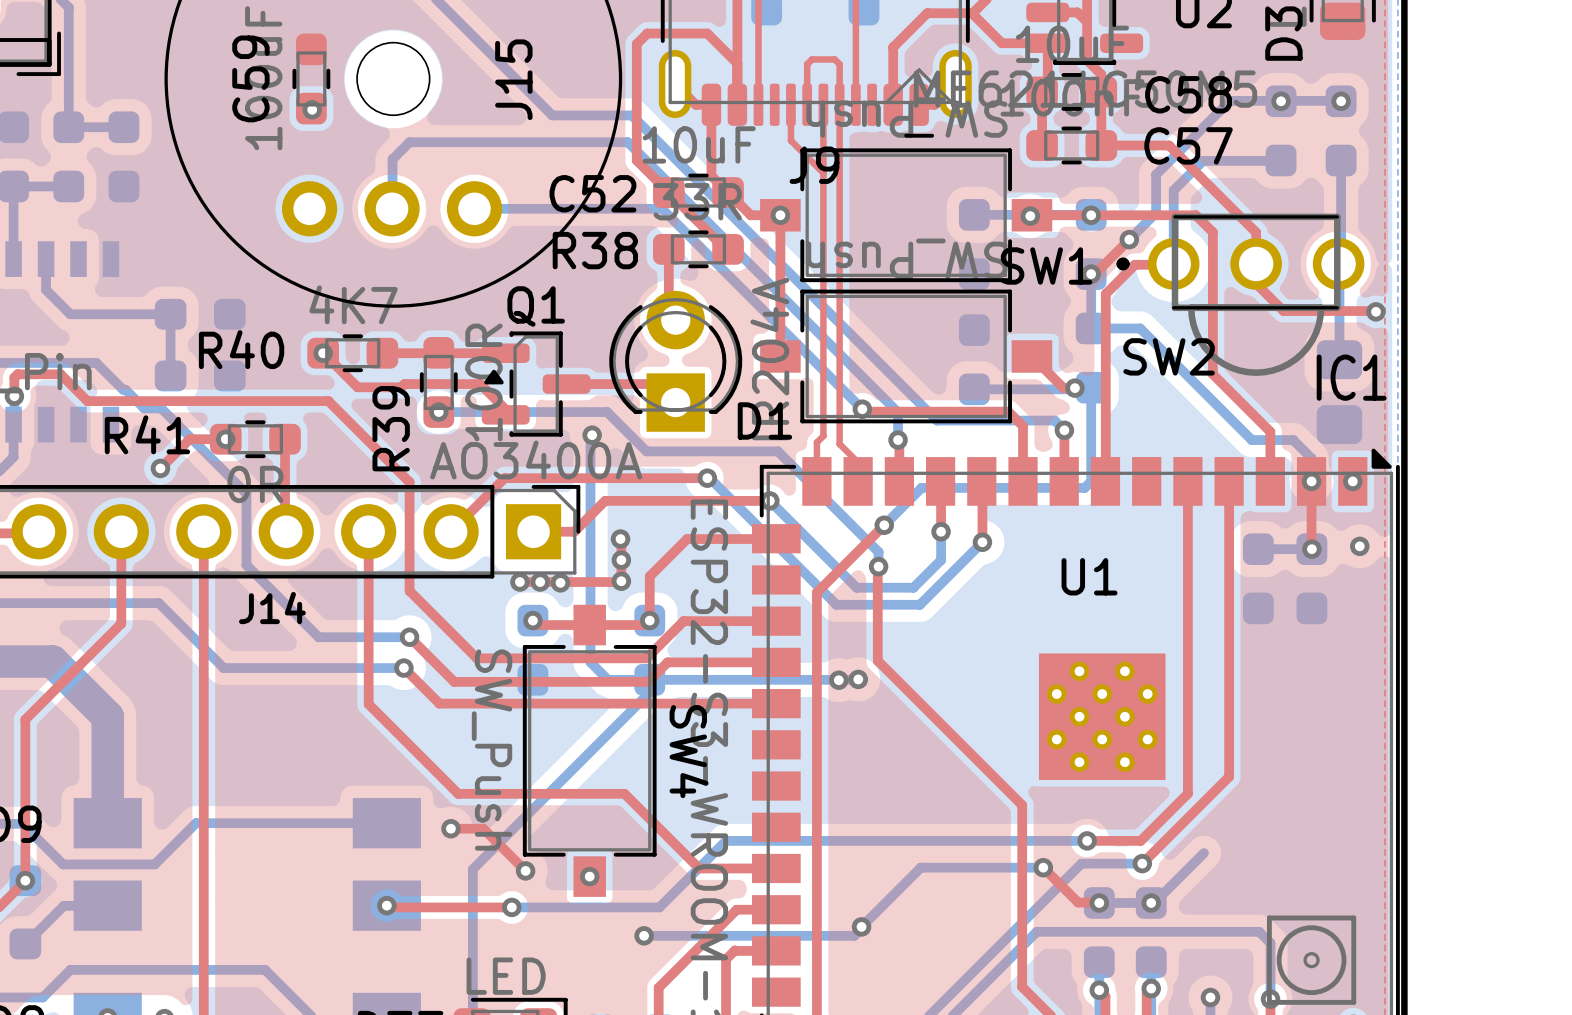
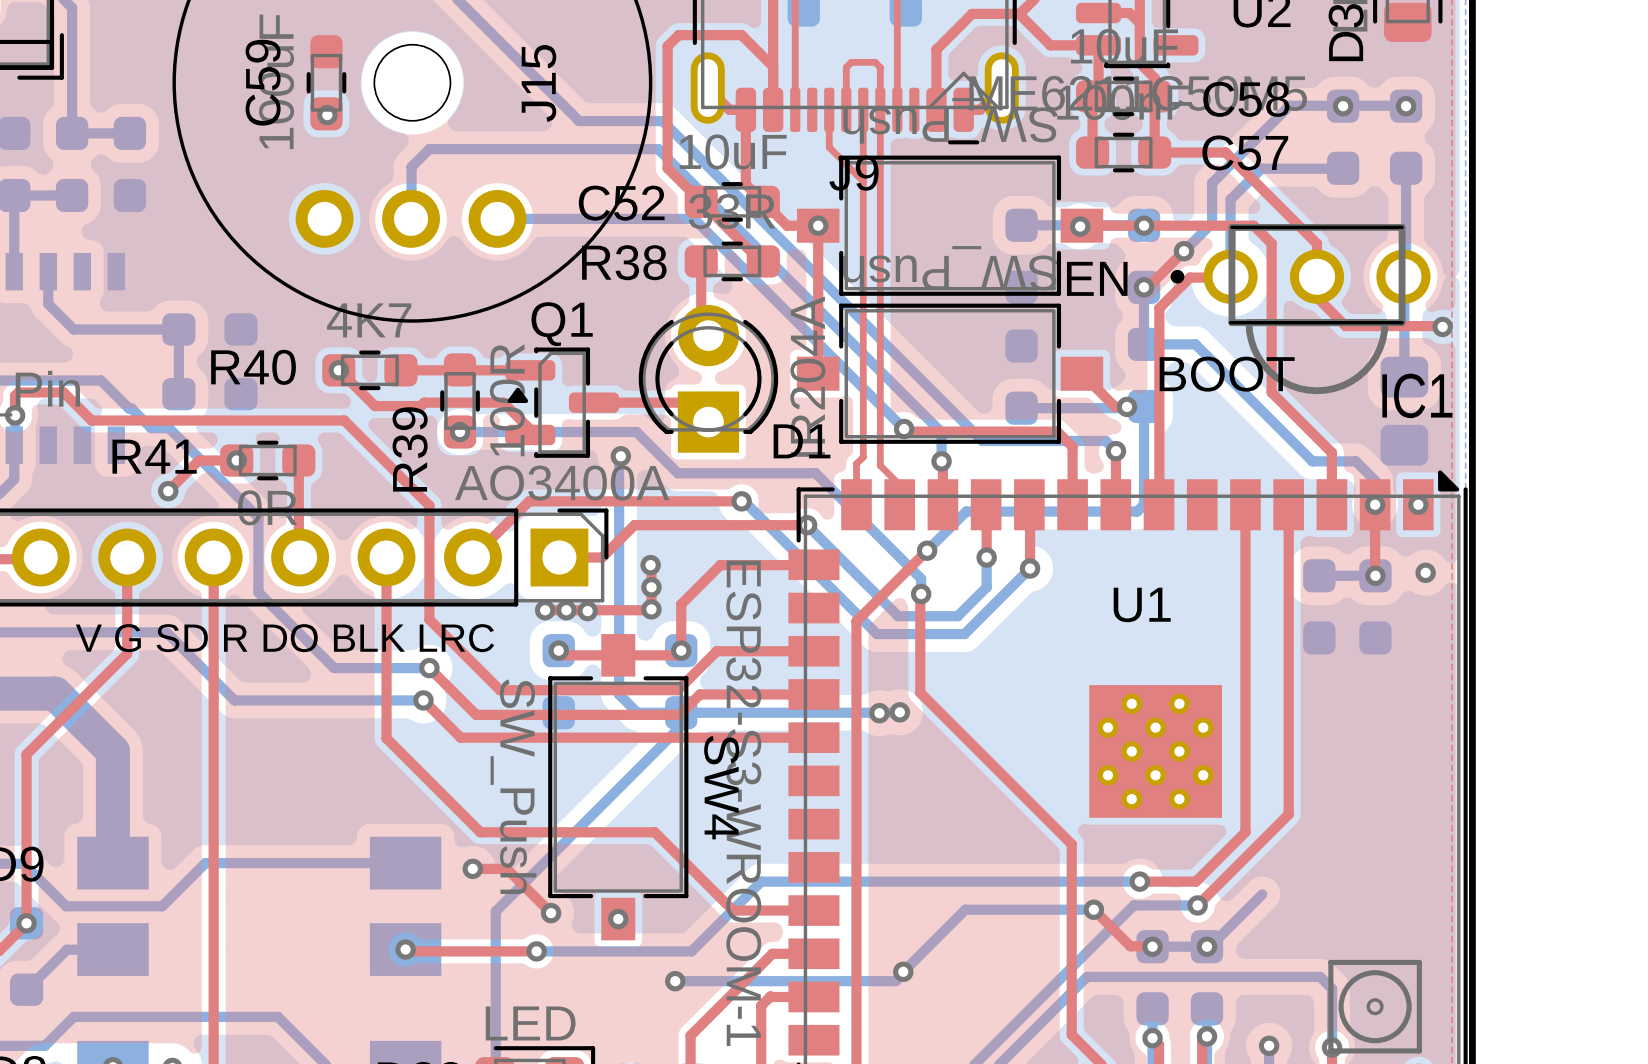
SW1 name: SW1 (1046, 265) -> EN (1097, 278)
SW2 name: SW2 (1169, 356) -> BOOT (1227, 374)
J14 name: J14 (272, 608) -> V G SD R DO BLK LRC (284, 638)

